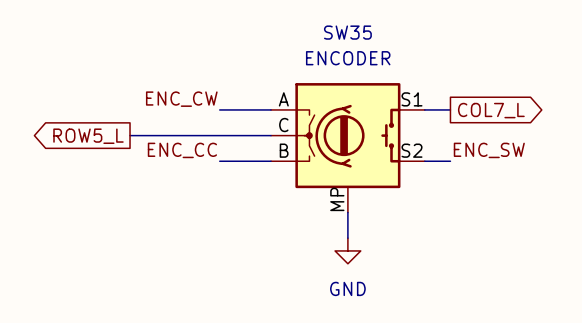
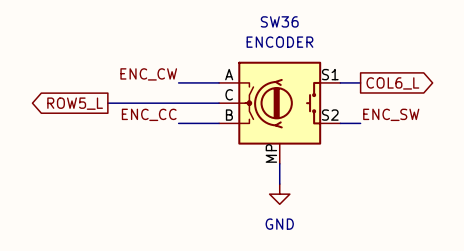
SW35 name: SW35 (347, 32) -> SW36 (279, 21)
global label: COL7_L (491, 110) -> COL6_L (392, 83)

